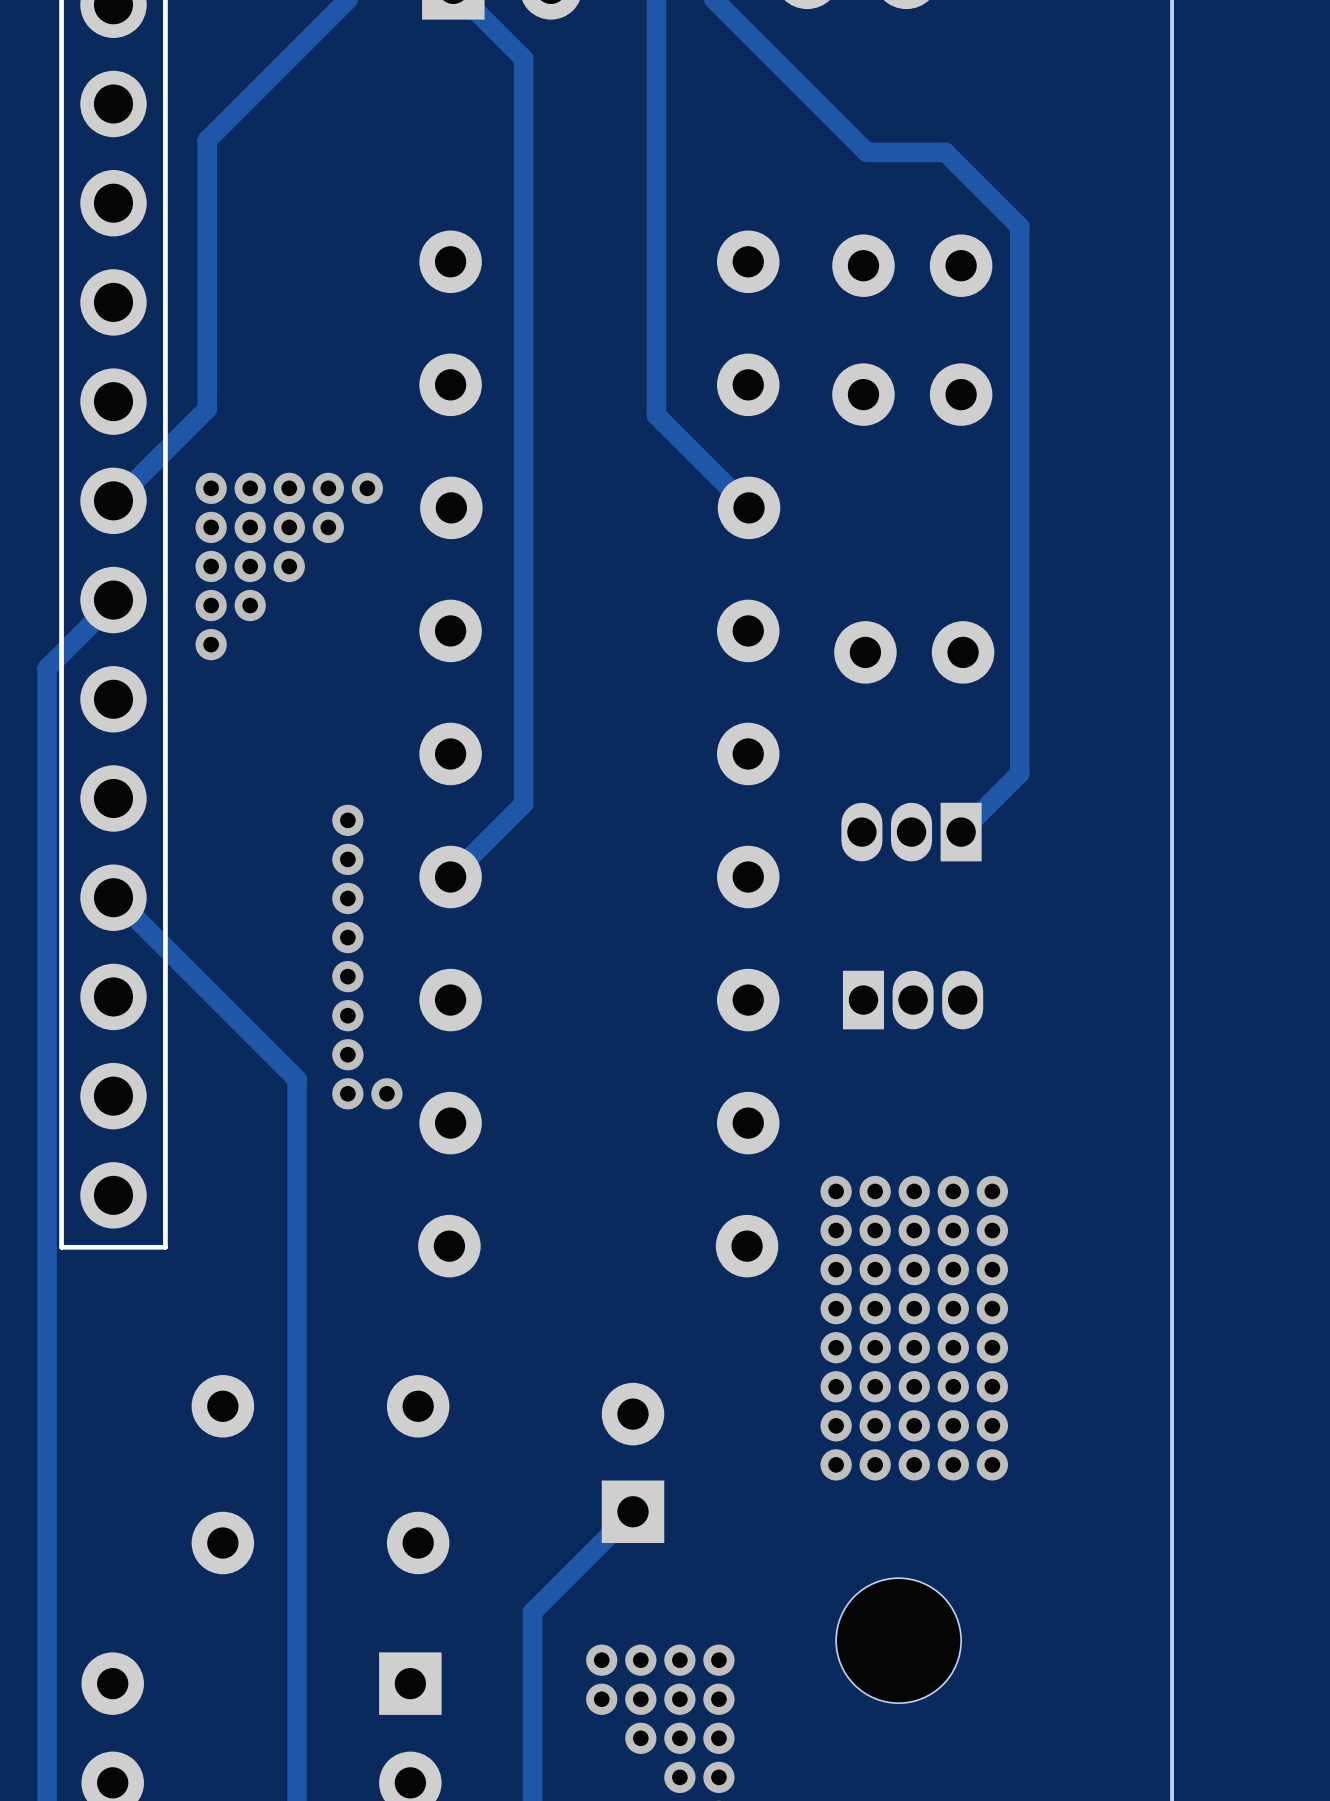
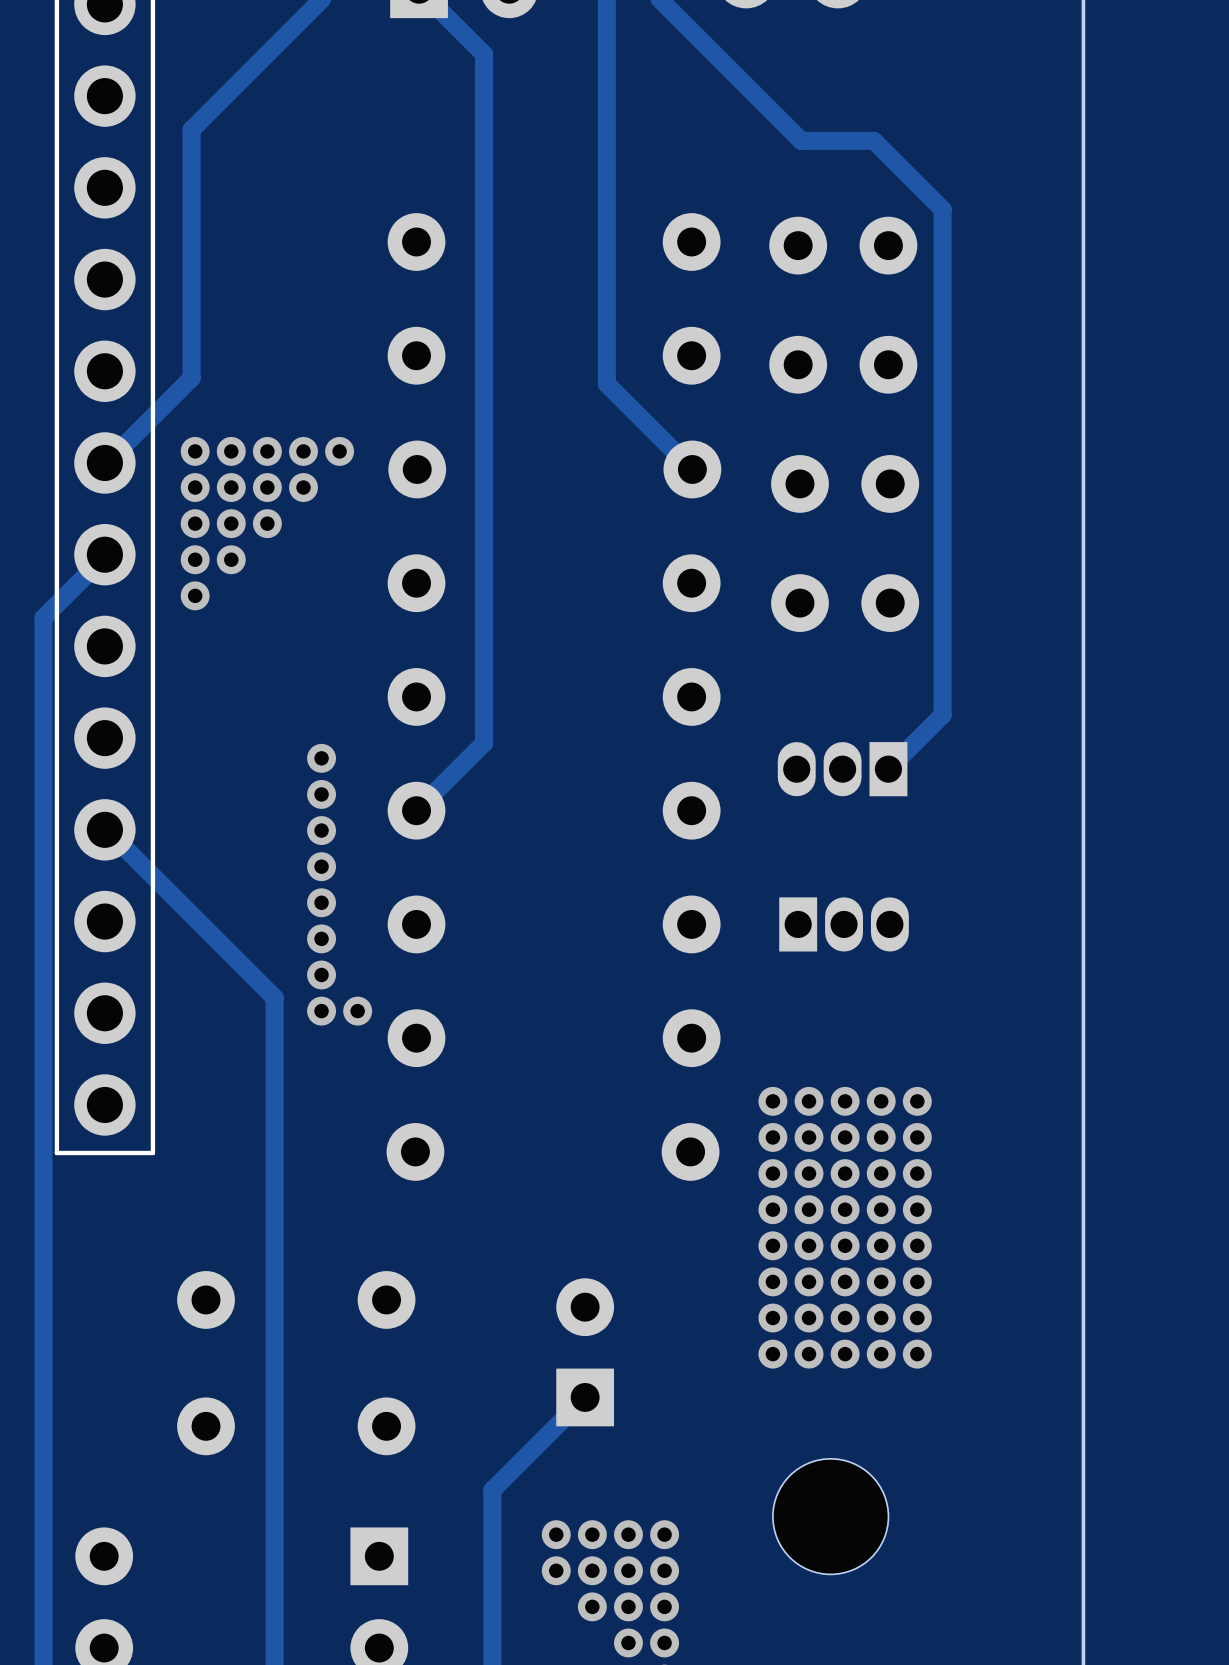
part: none -> (845, 483)

